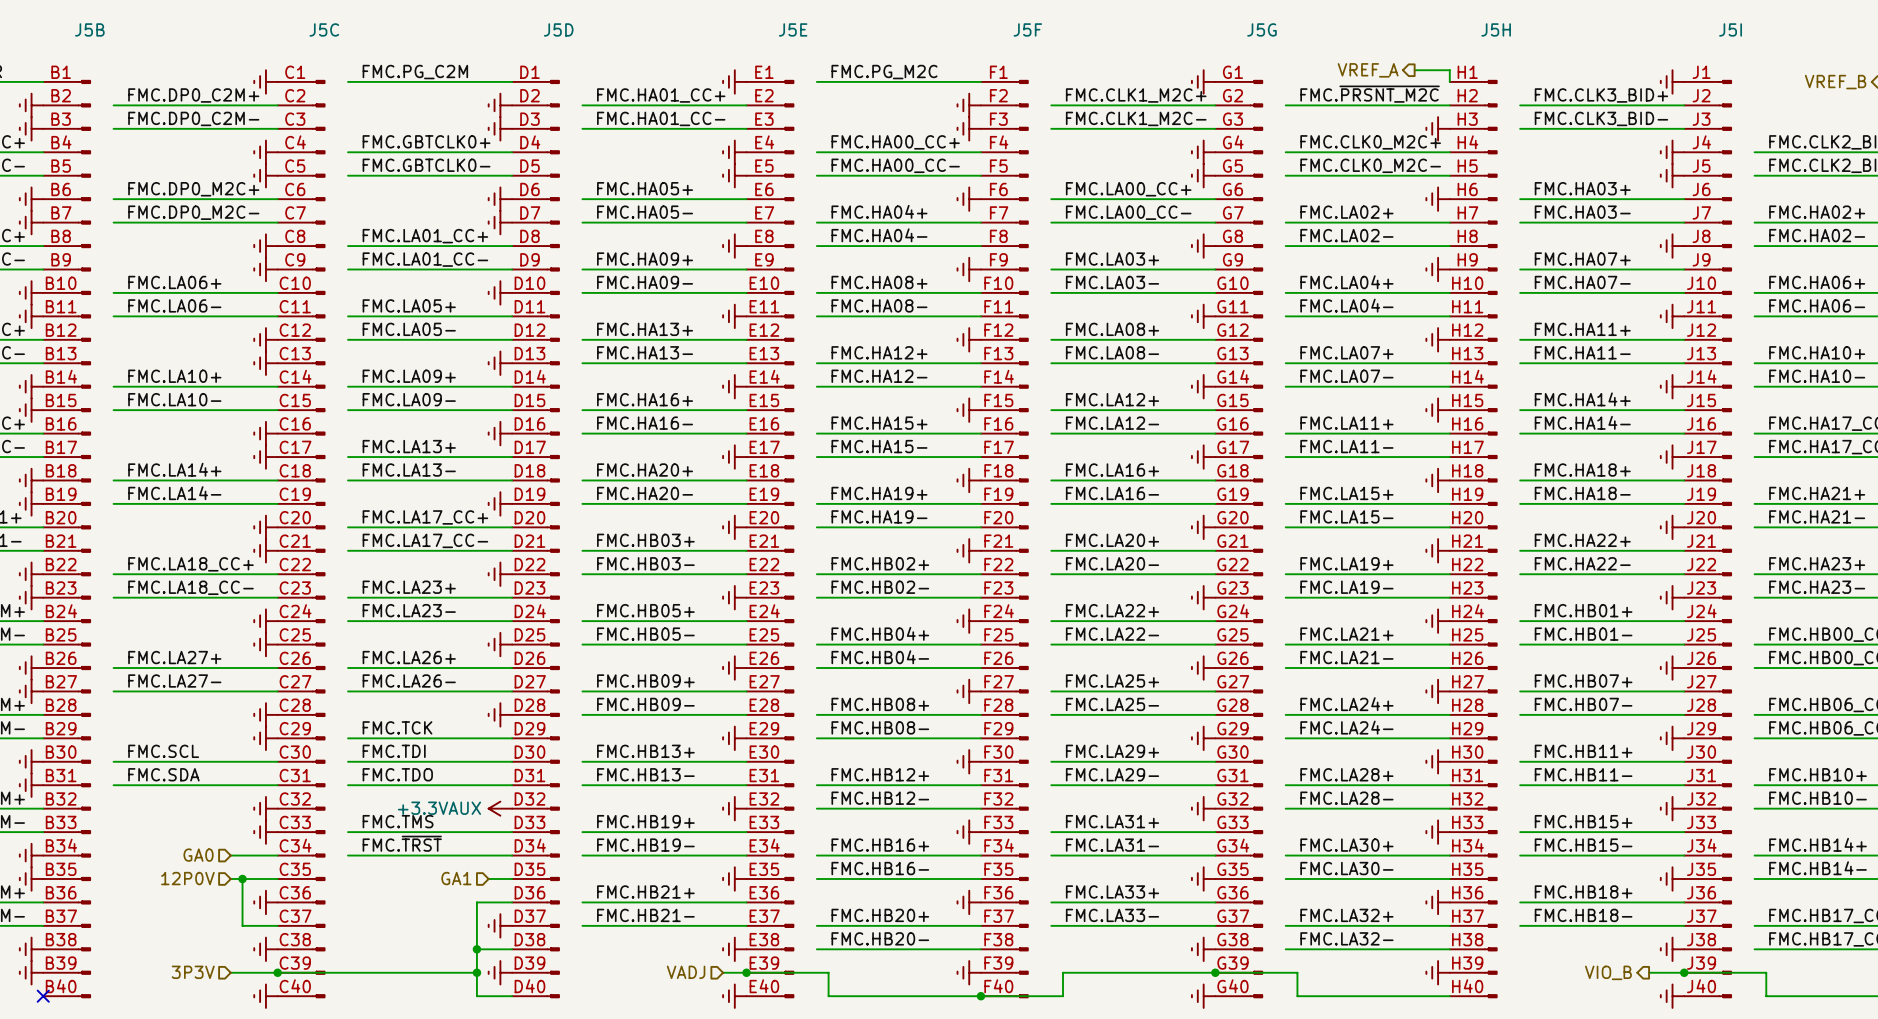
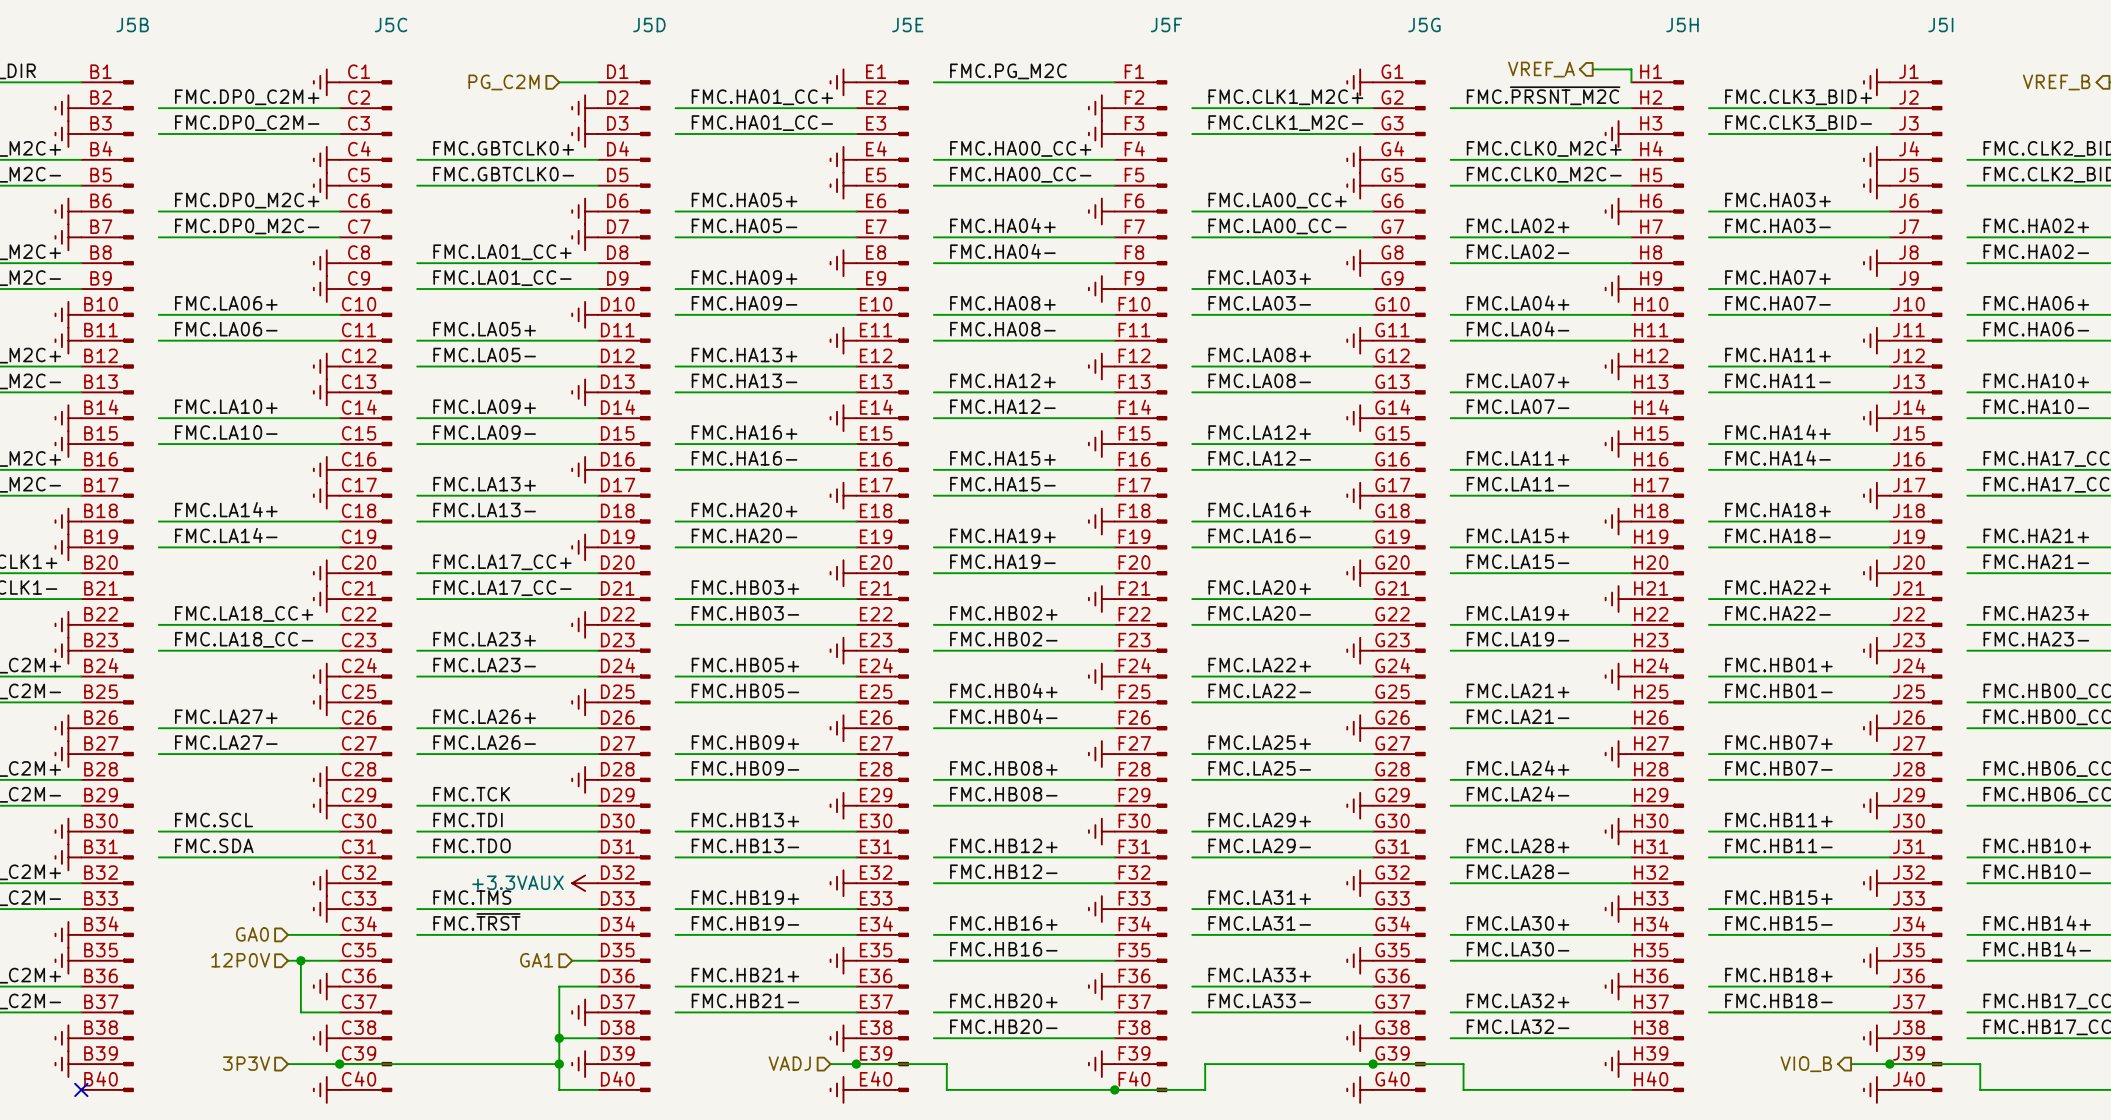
label: FMC.PG_C2M (415, 72) -> none
wire: (348, 81) (476, 81) -> none
hierarchical label: none -> PG_C2M (504, 82)

